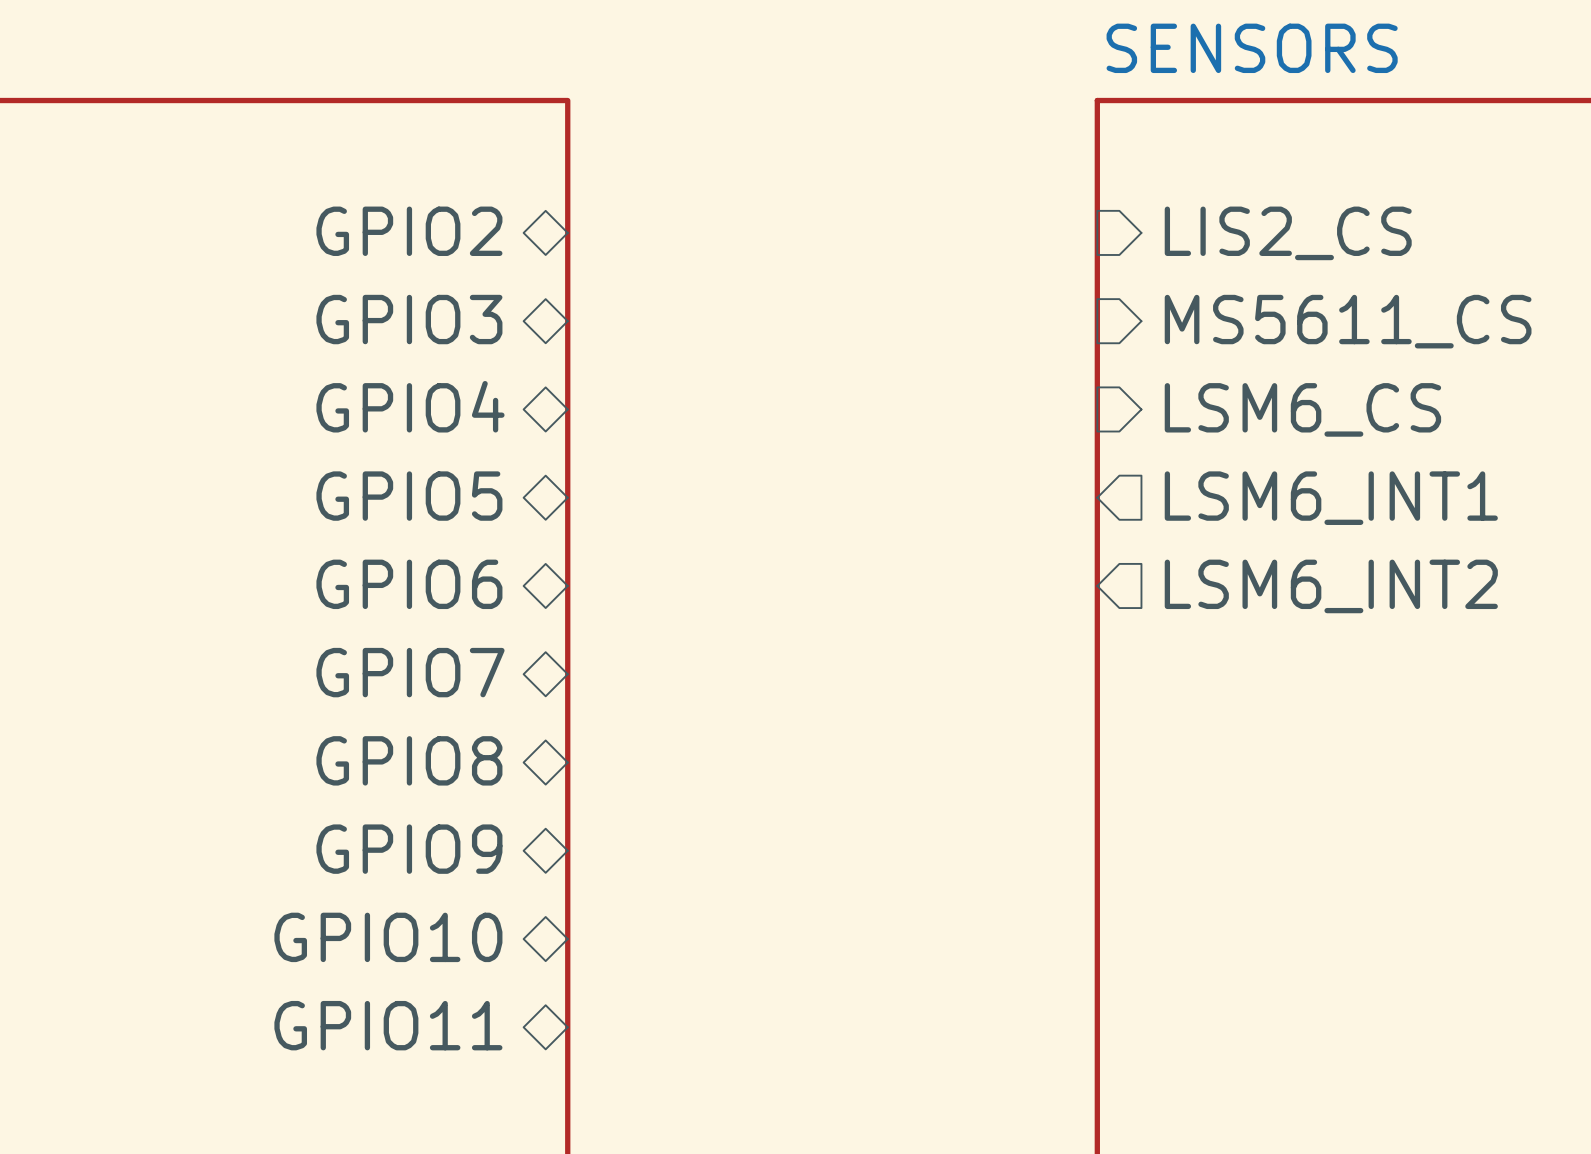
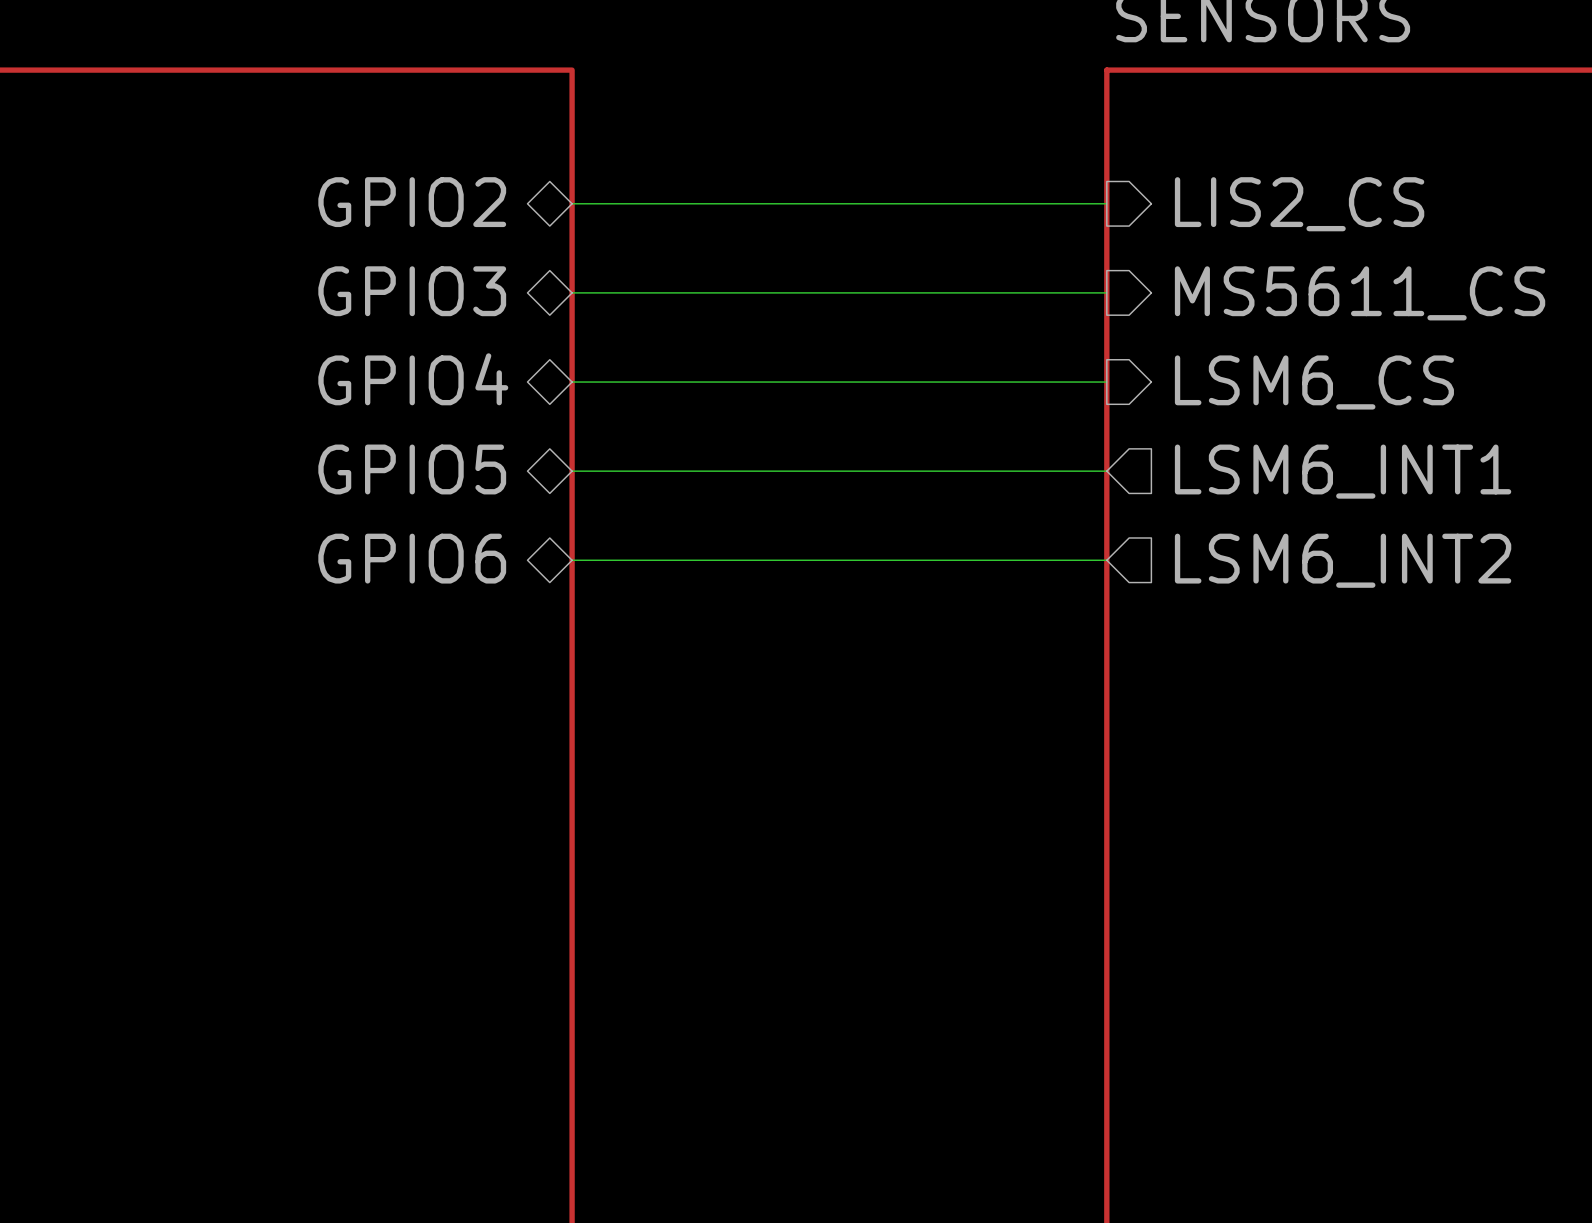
wire: none -> (572, 203) (1106, 203)
wire: none -> (572, 292) (1106, 292)
wire: none -> (572, 382) (1106, 382)
wire: none -> (572, 471) (1106, 471)
wire: none -> (572, 560) (1106, 560)
sheet pin: GPIO7 (410, 672) -> none
sheet pin: GPIO8 (409, 760) -> none
sheet pin: GPIO9 (409, 849) -> none
sheet pin: GPIO10 (388, 937) -> none
sheet pin: GPIO11 (388, 1025) -> none

